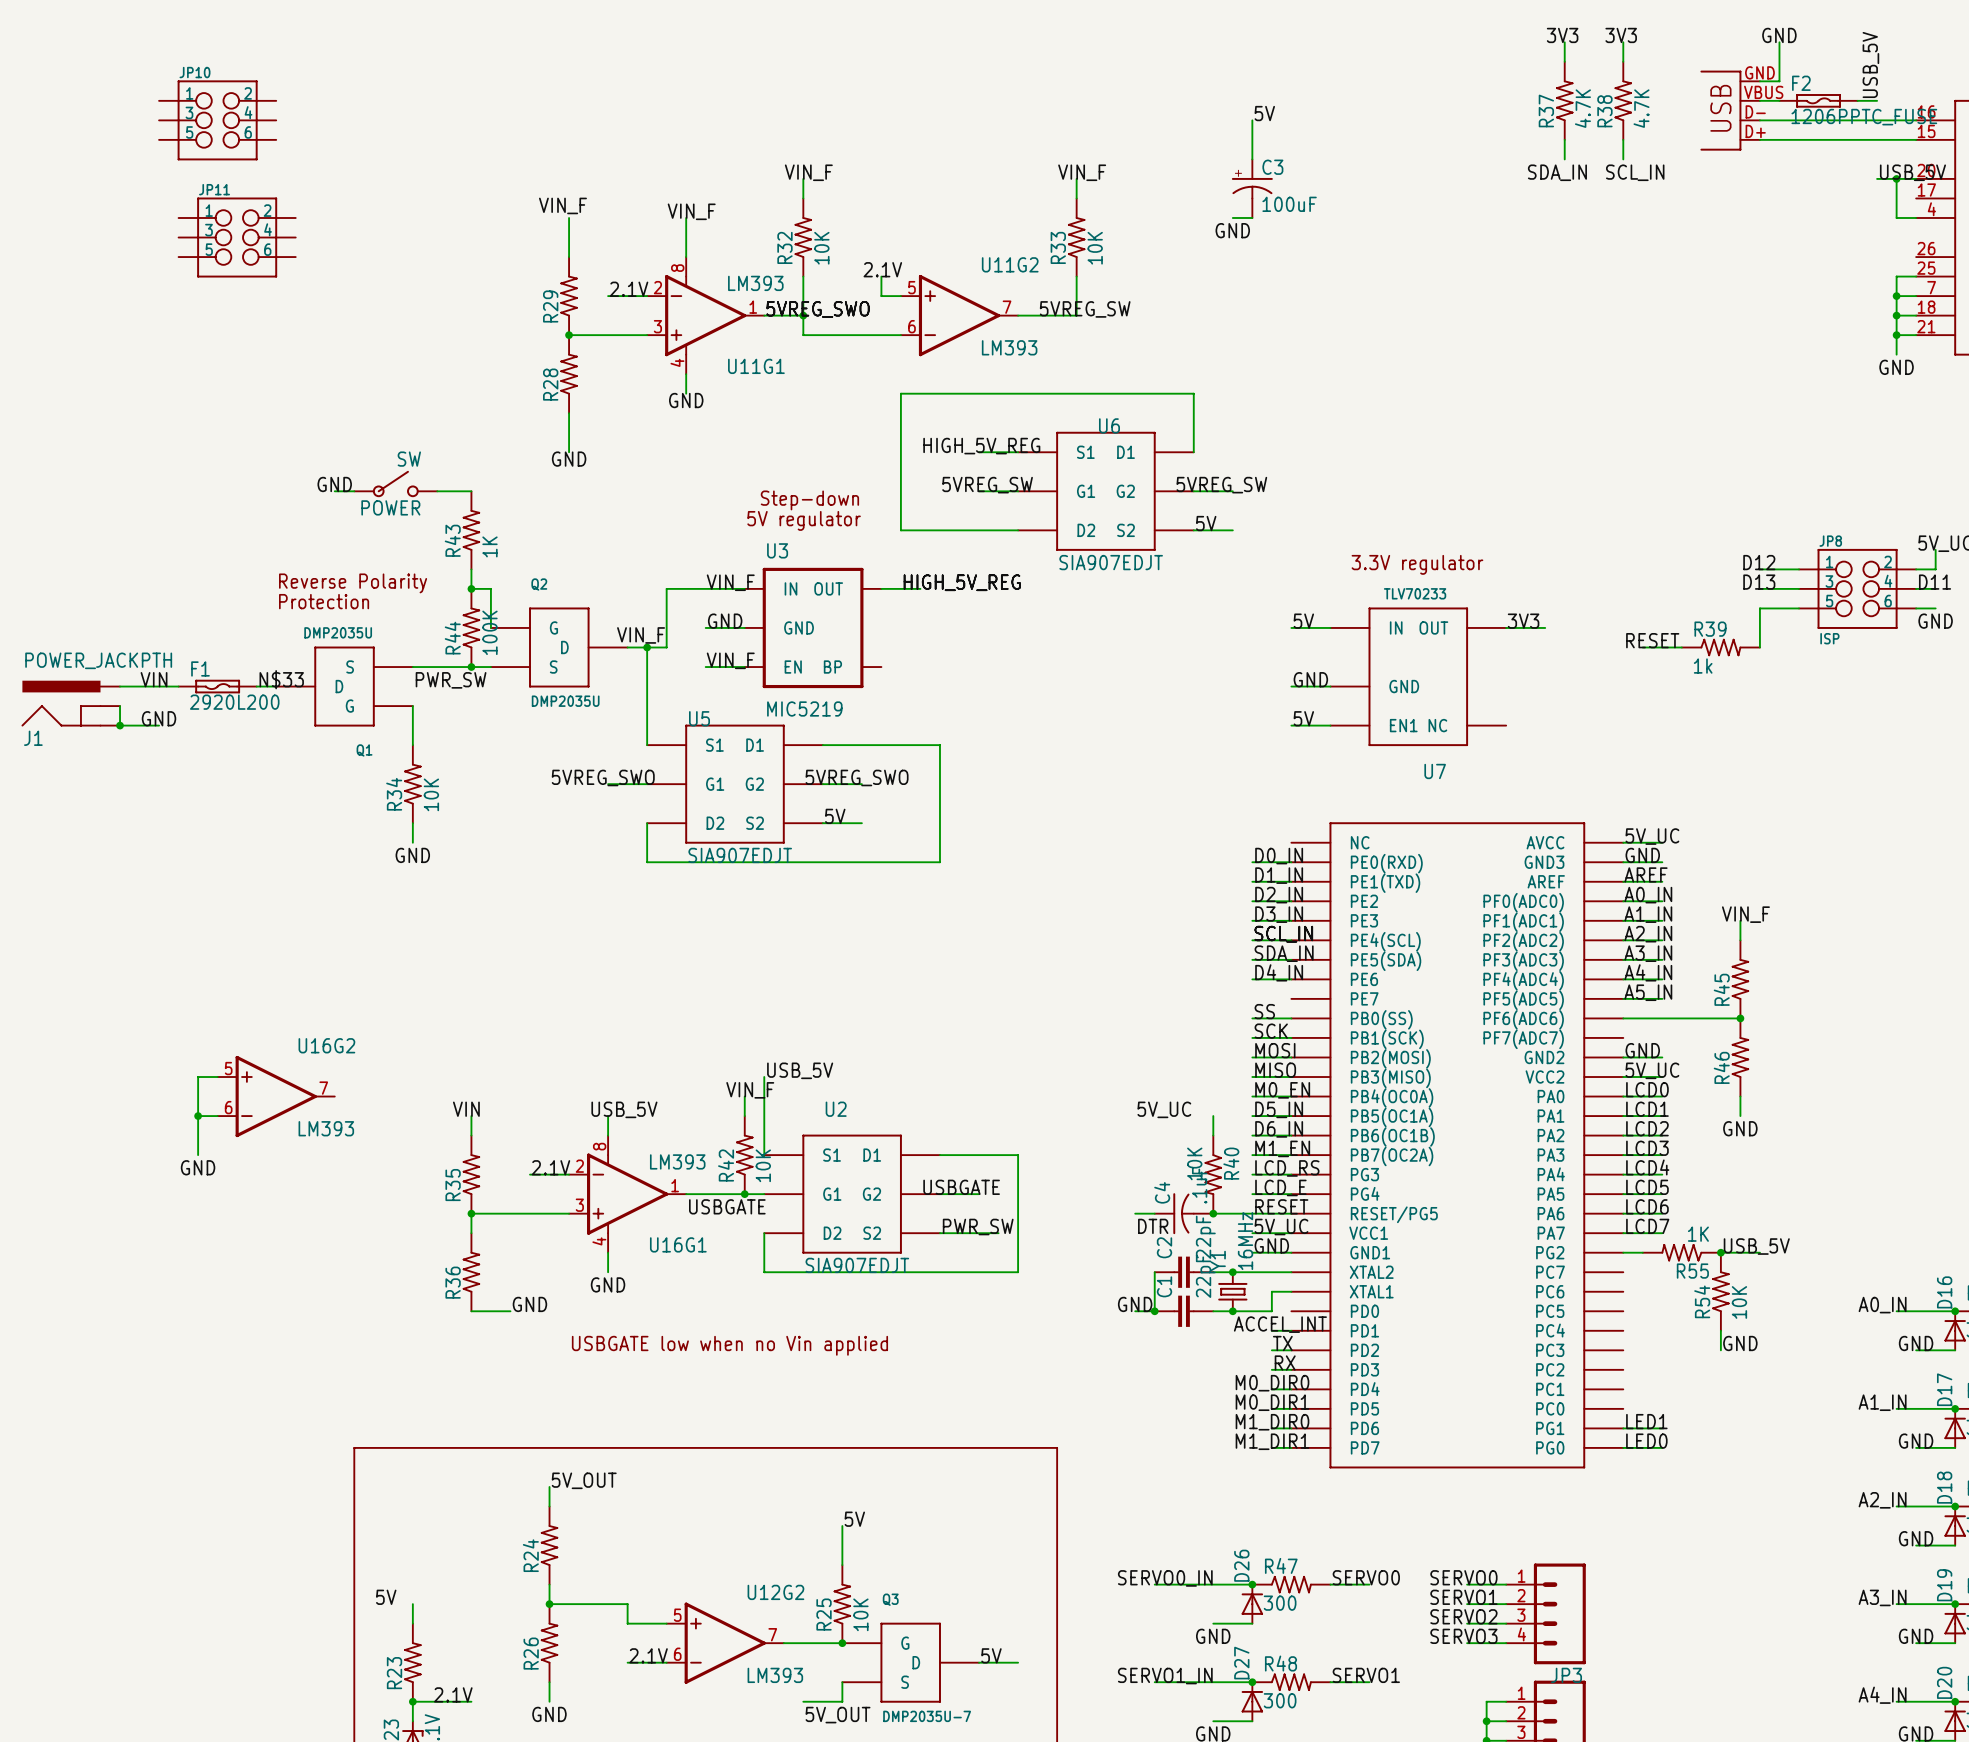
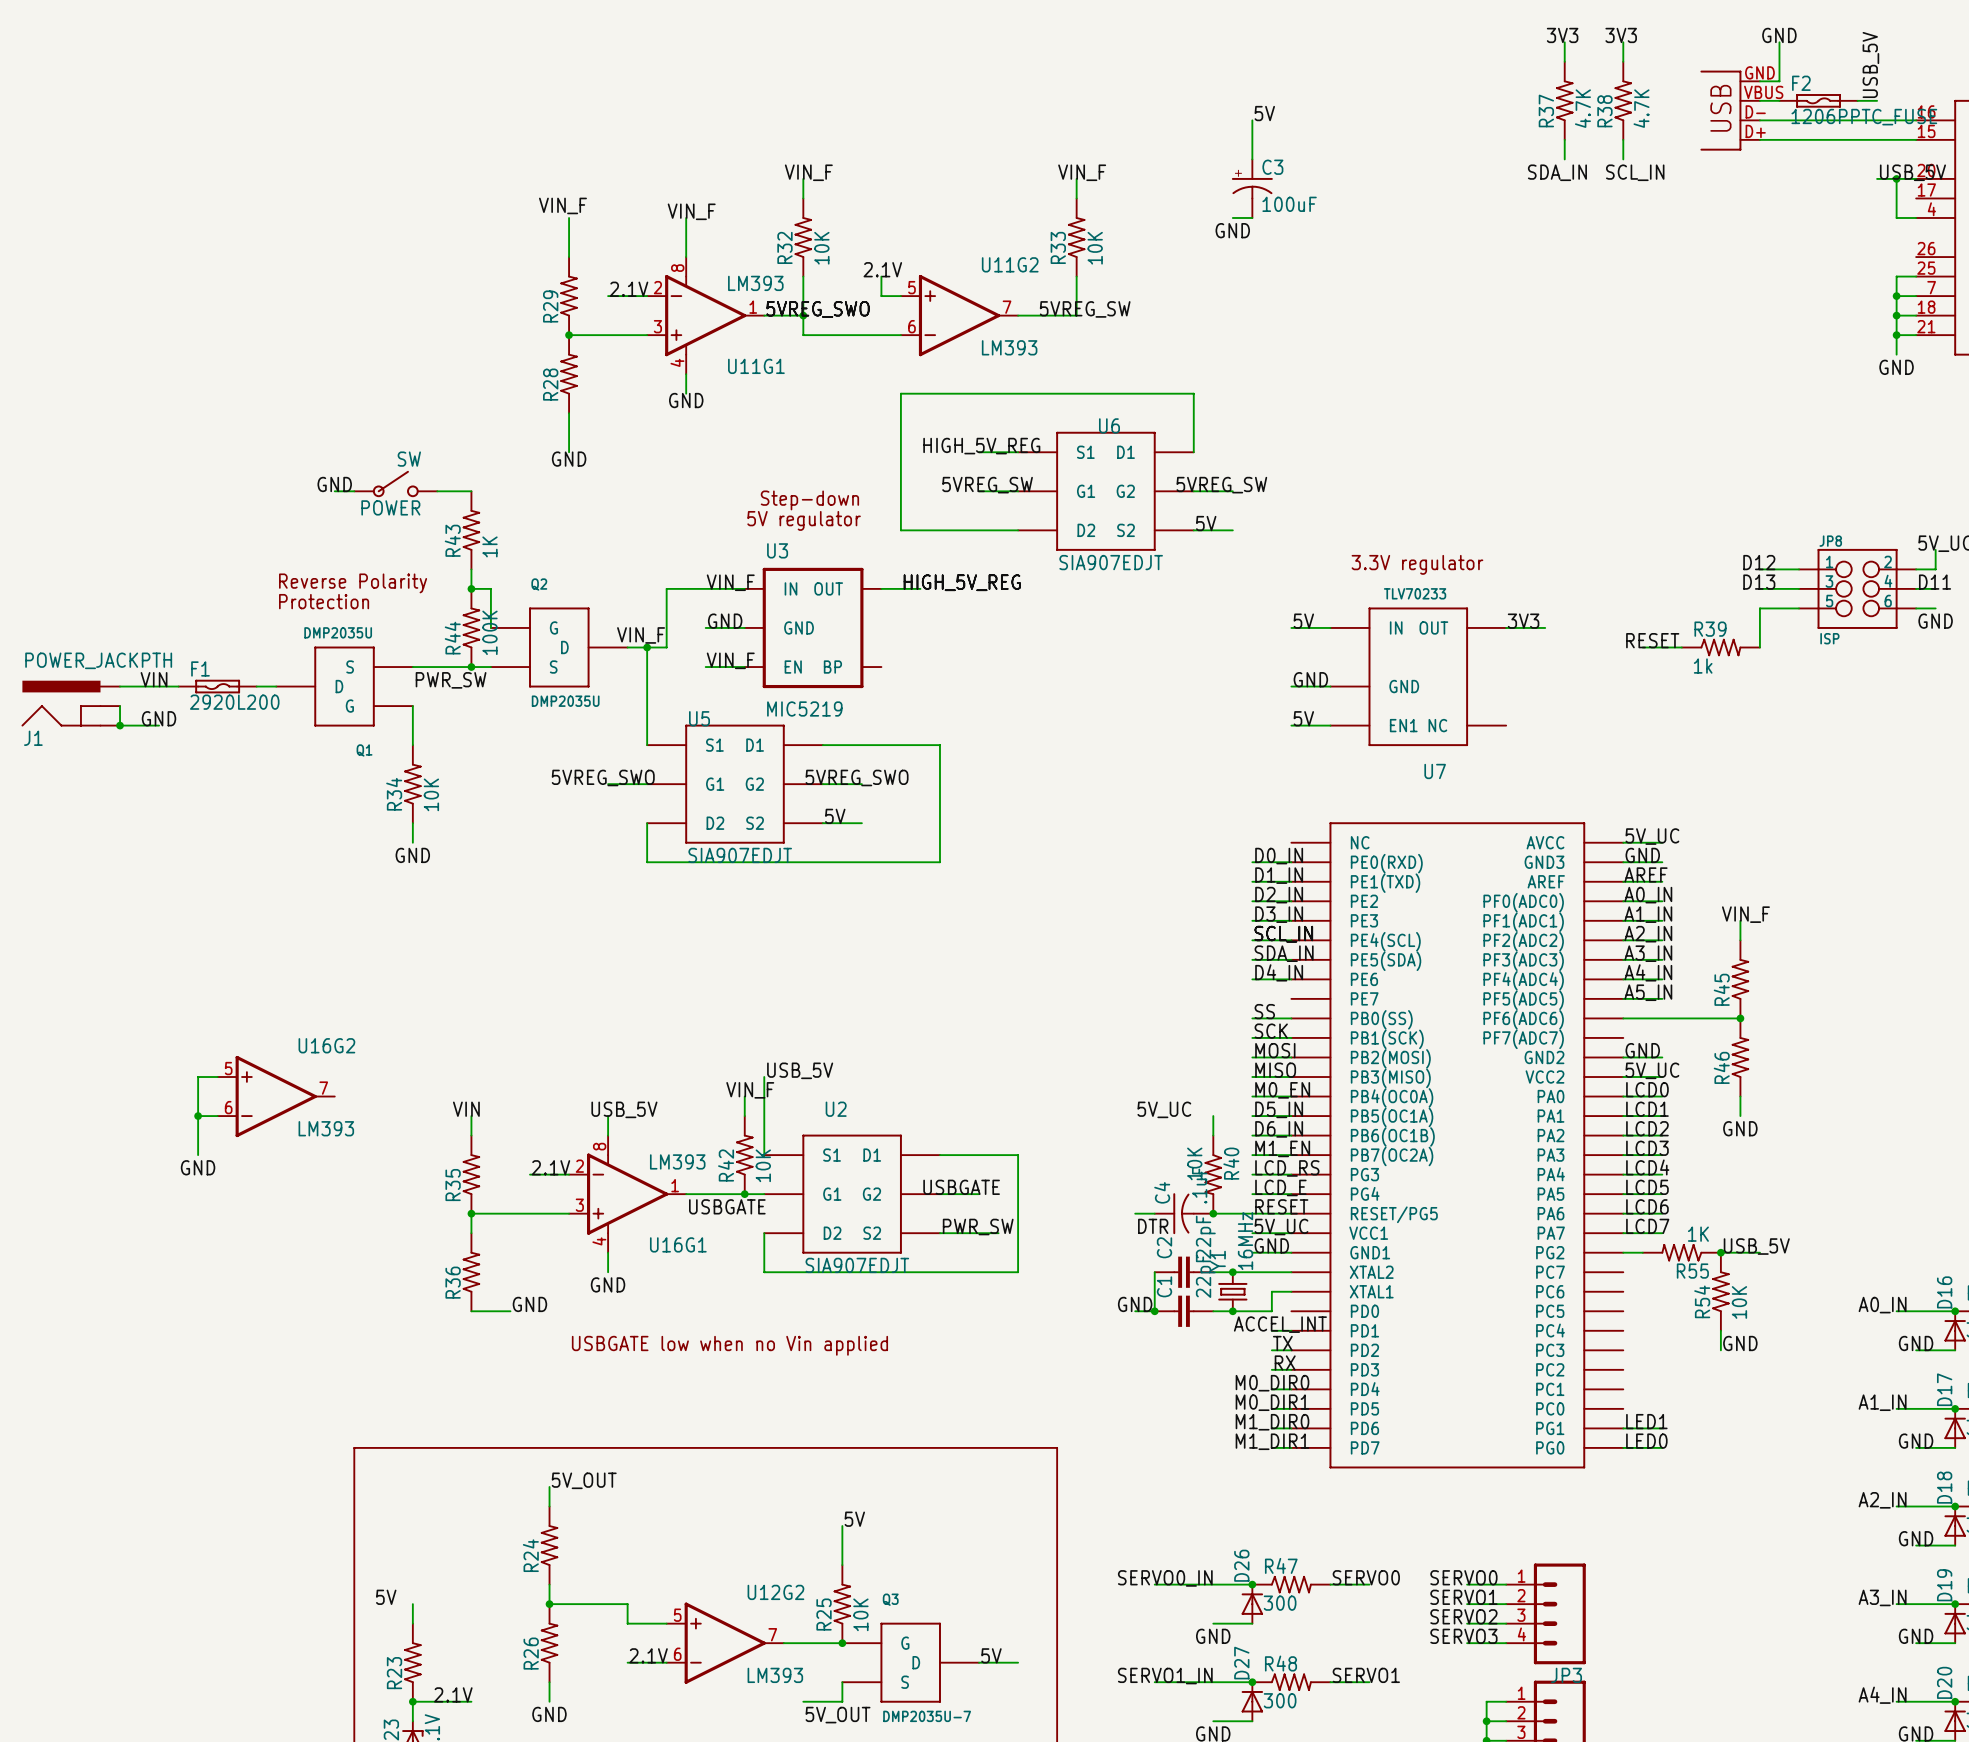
JP10: (217, 120) -> none
JP11: (237, 237) -> none
label: N$33 (281, 679) -> none

